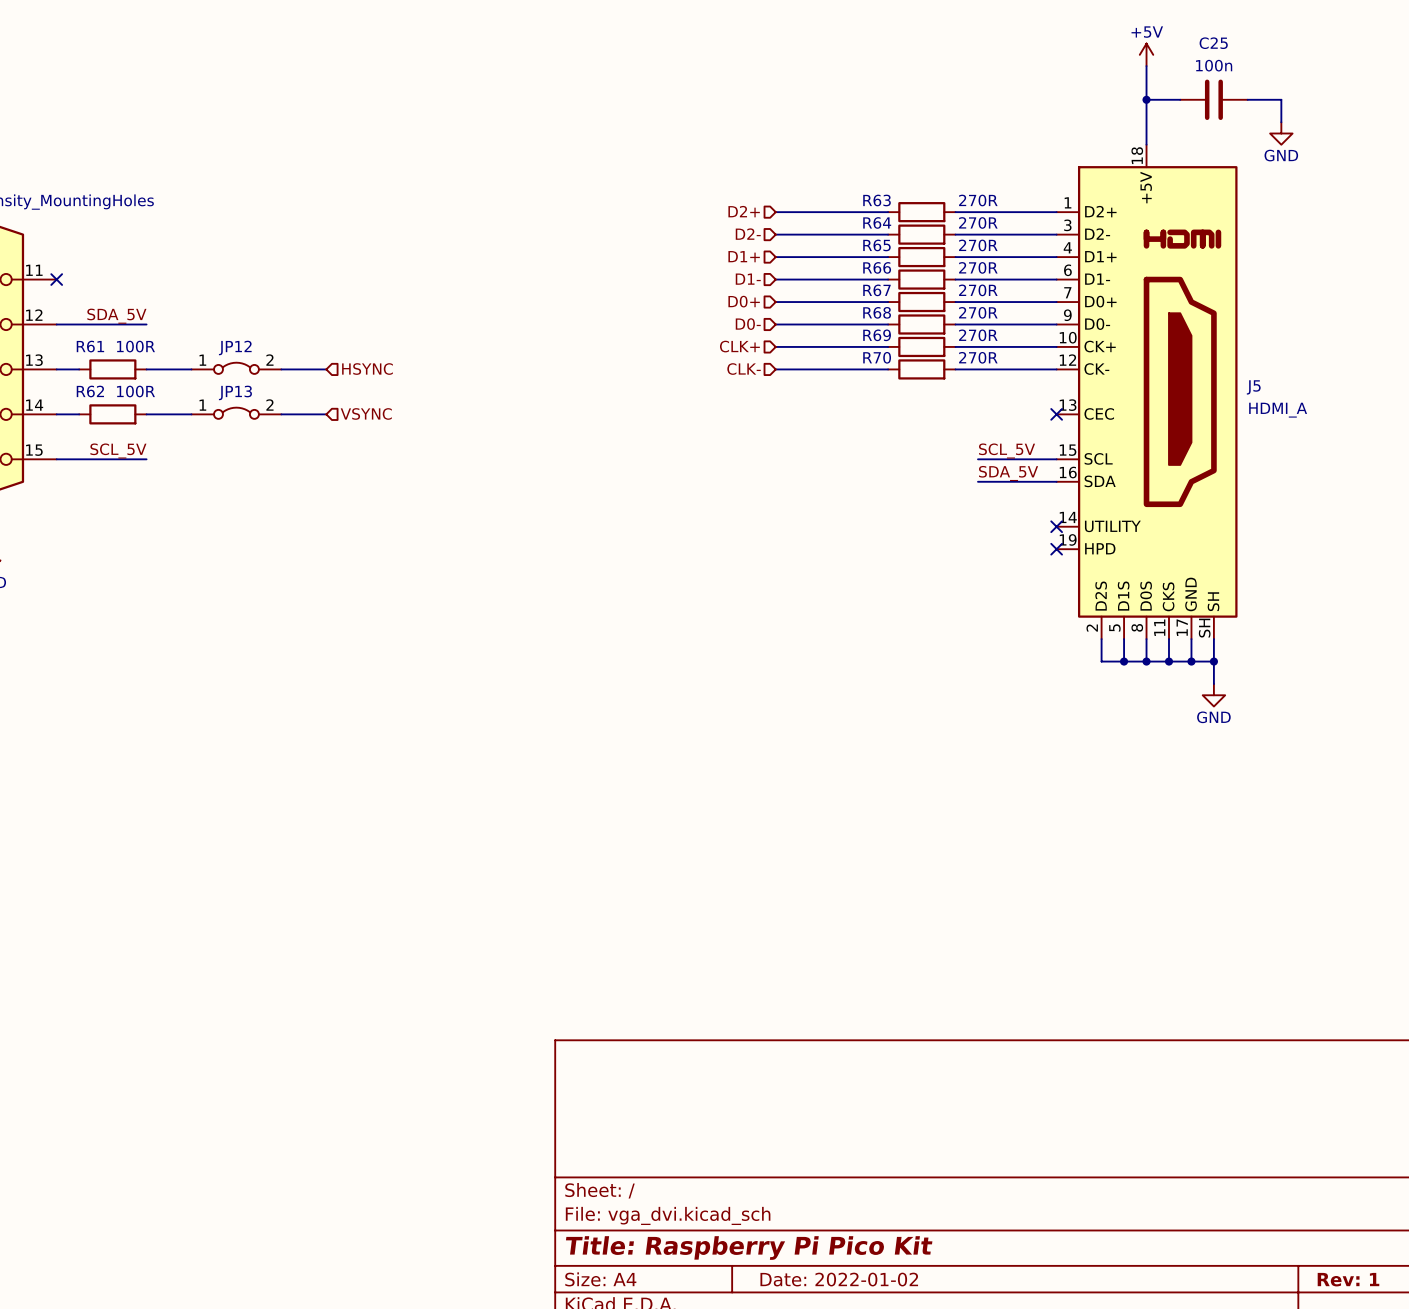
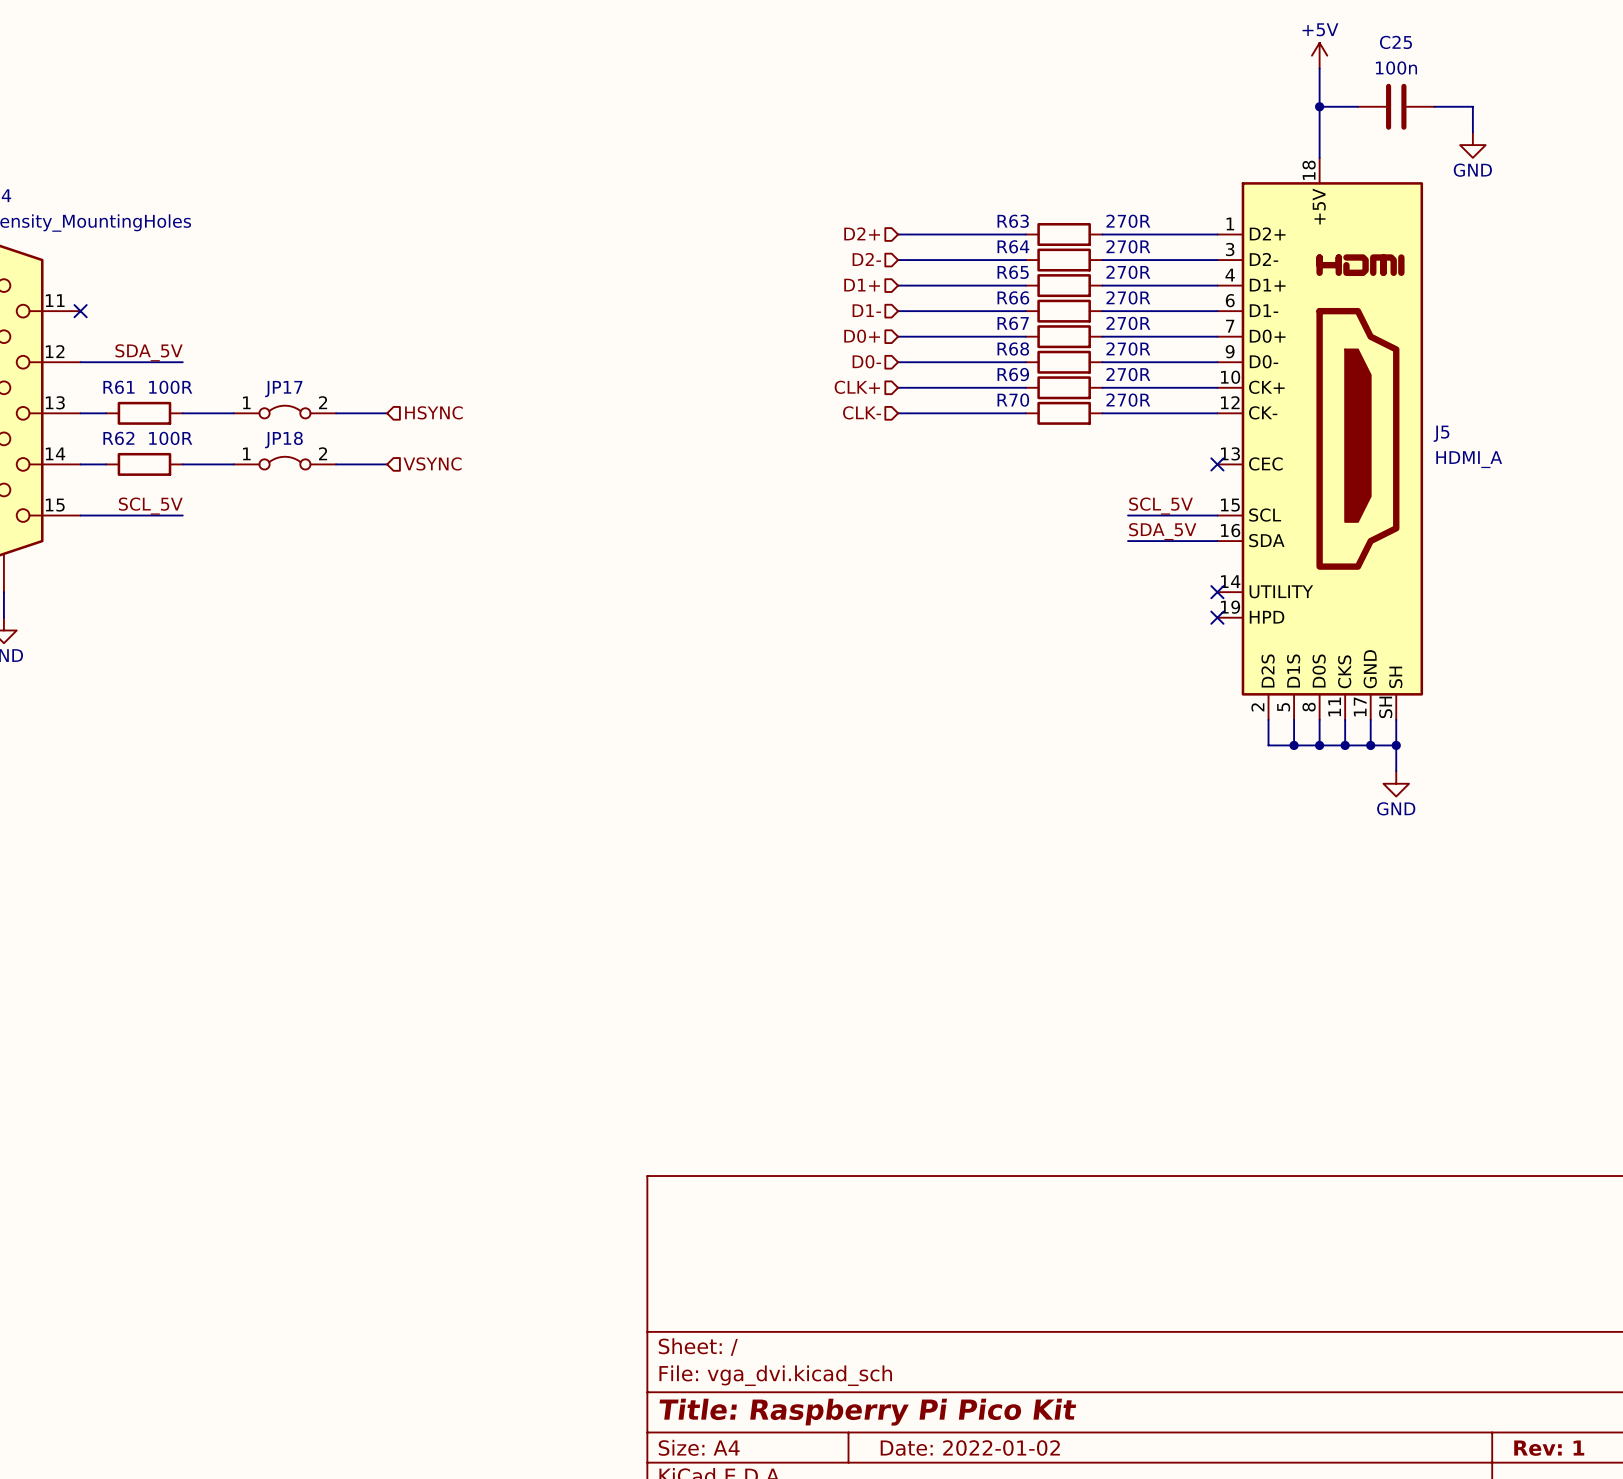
JP12 name: JP12 (235, 347) -> JP17 (283, 389)
JP13 name: JP13 (235, 392) -> JP18 (283, 440)

